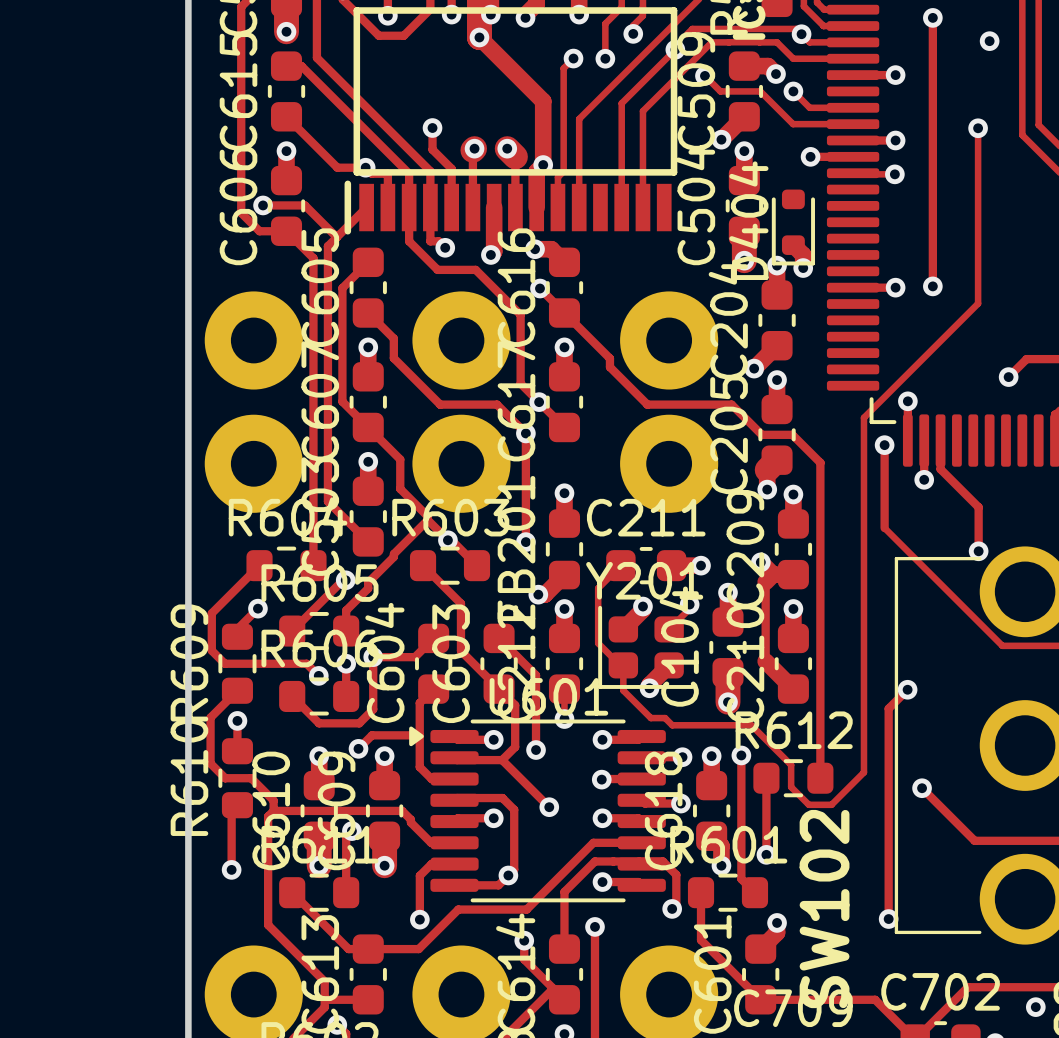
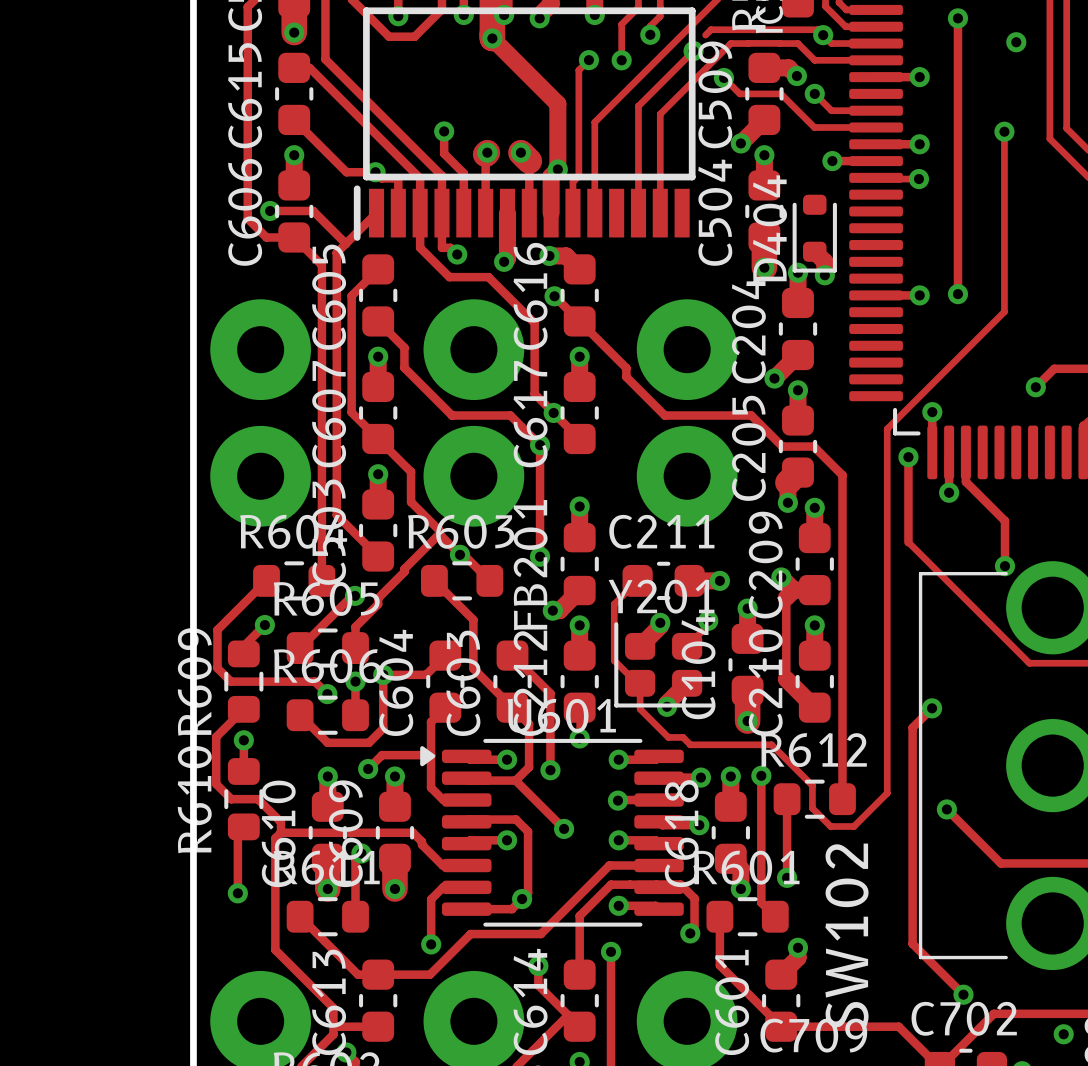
track: none -> (912, 943) (963, 994)
via position: (888, 919) -> (963, 994)

